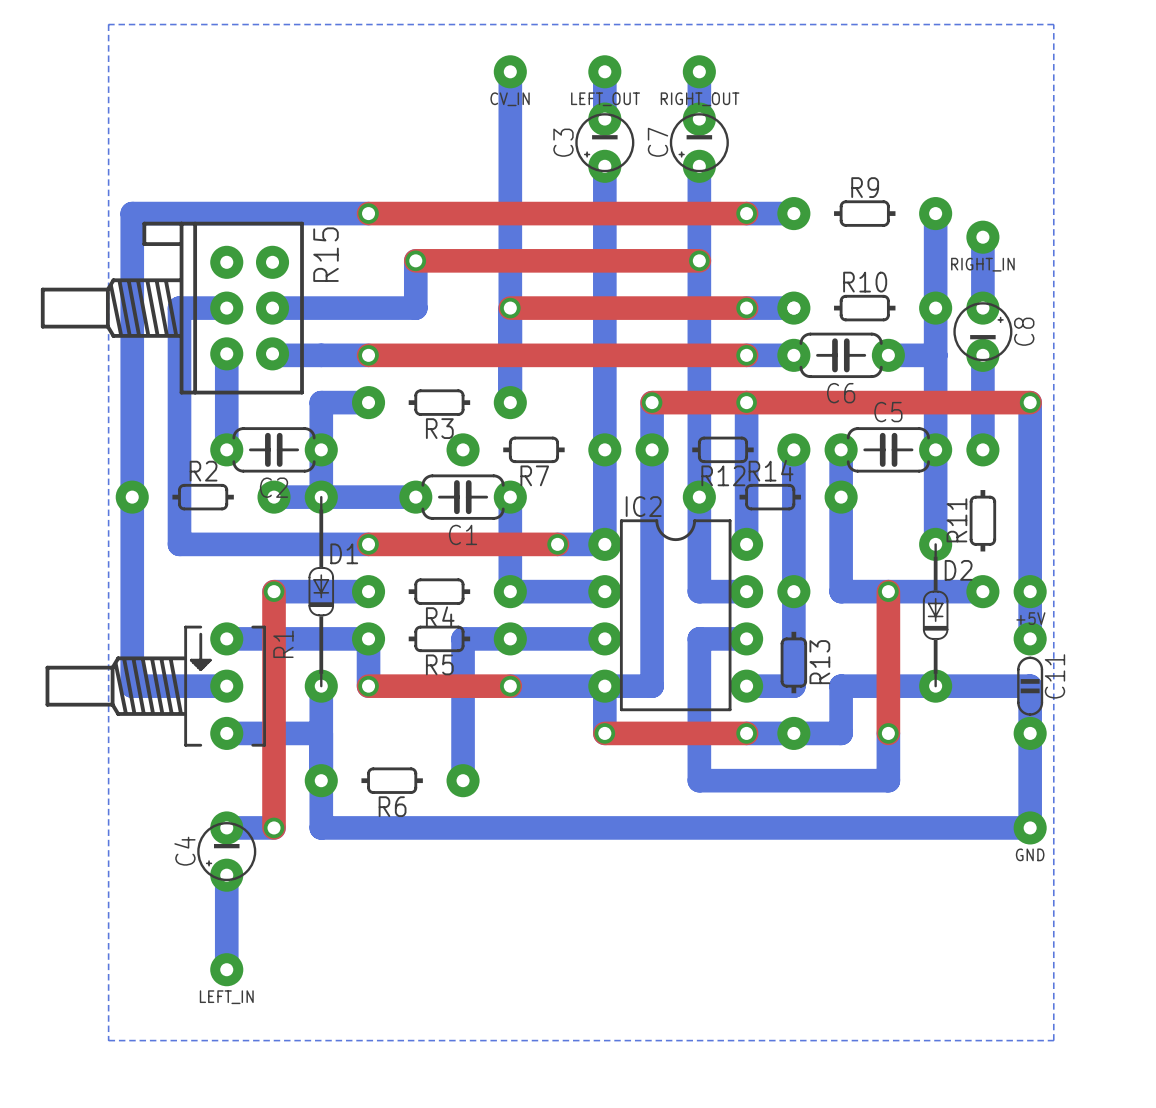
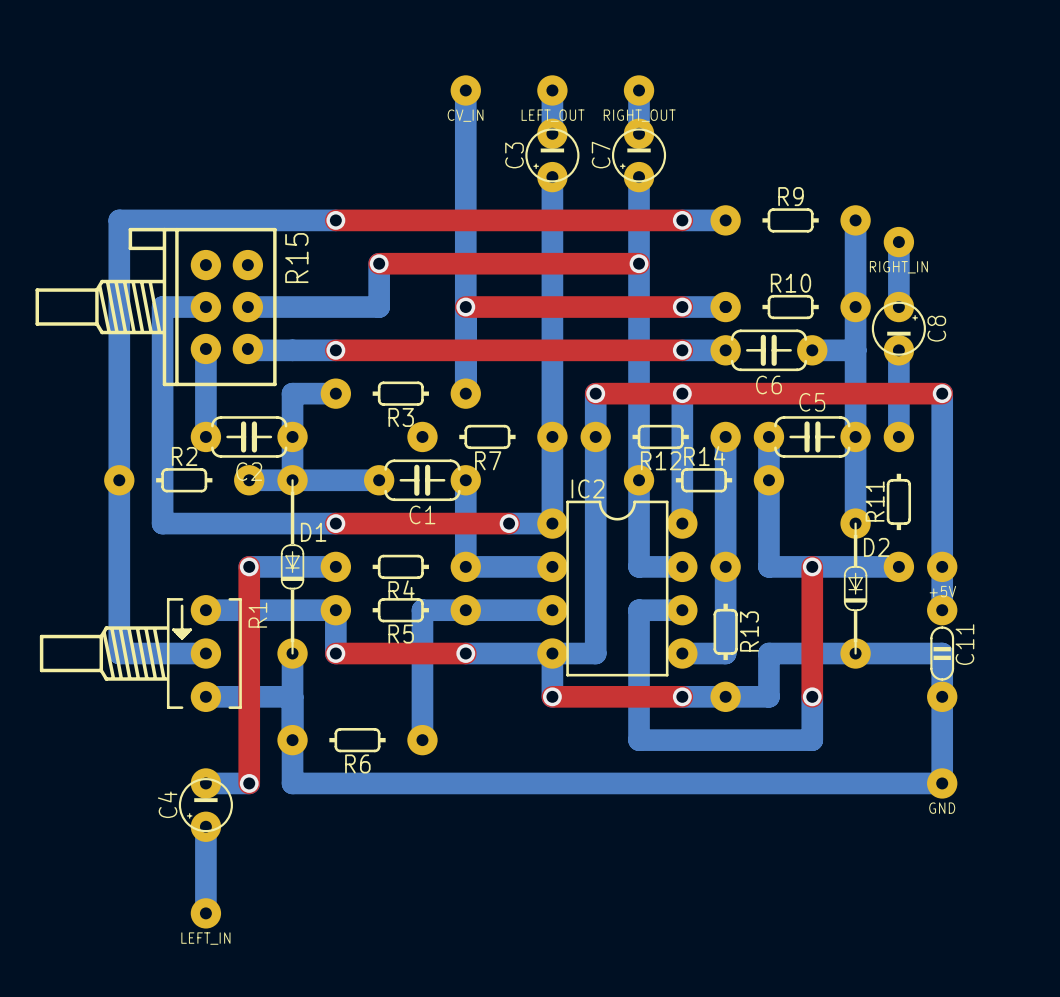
bottom zone outline: (108, 24) (108, 1040) (1053, 1040) (1053, 24) (108, 24) -> none

